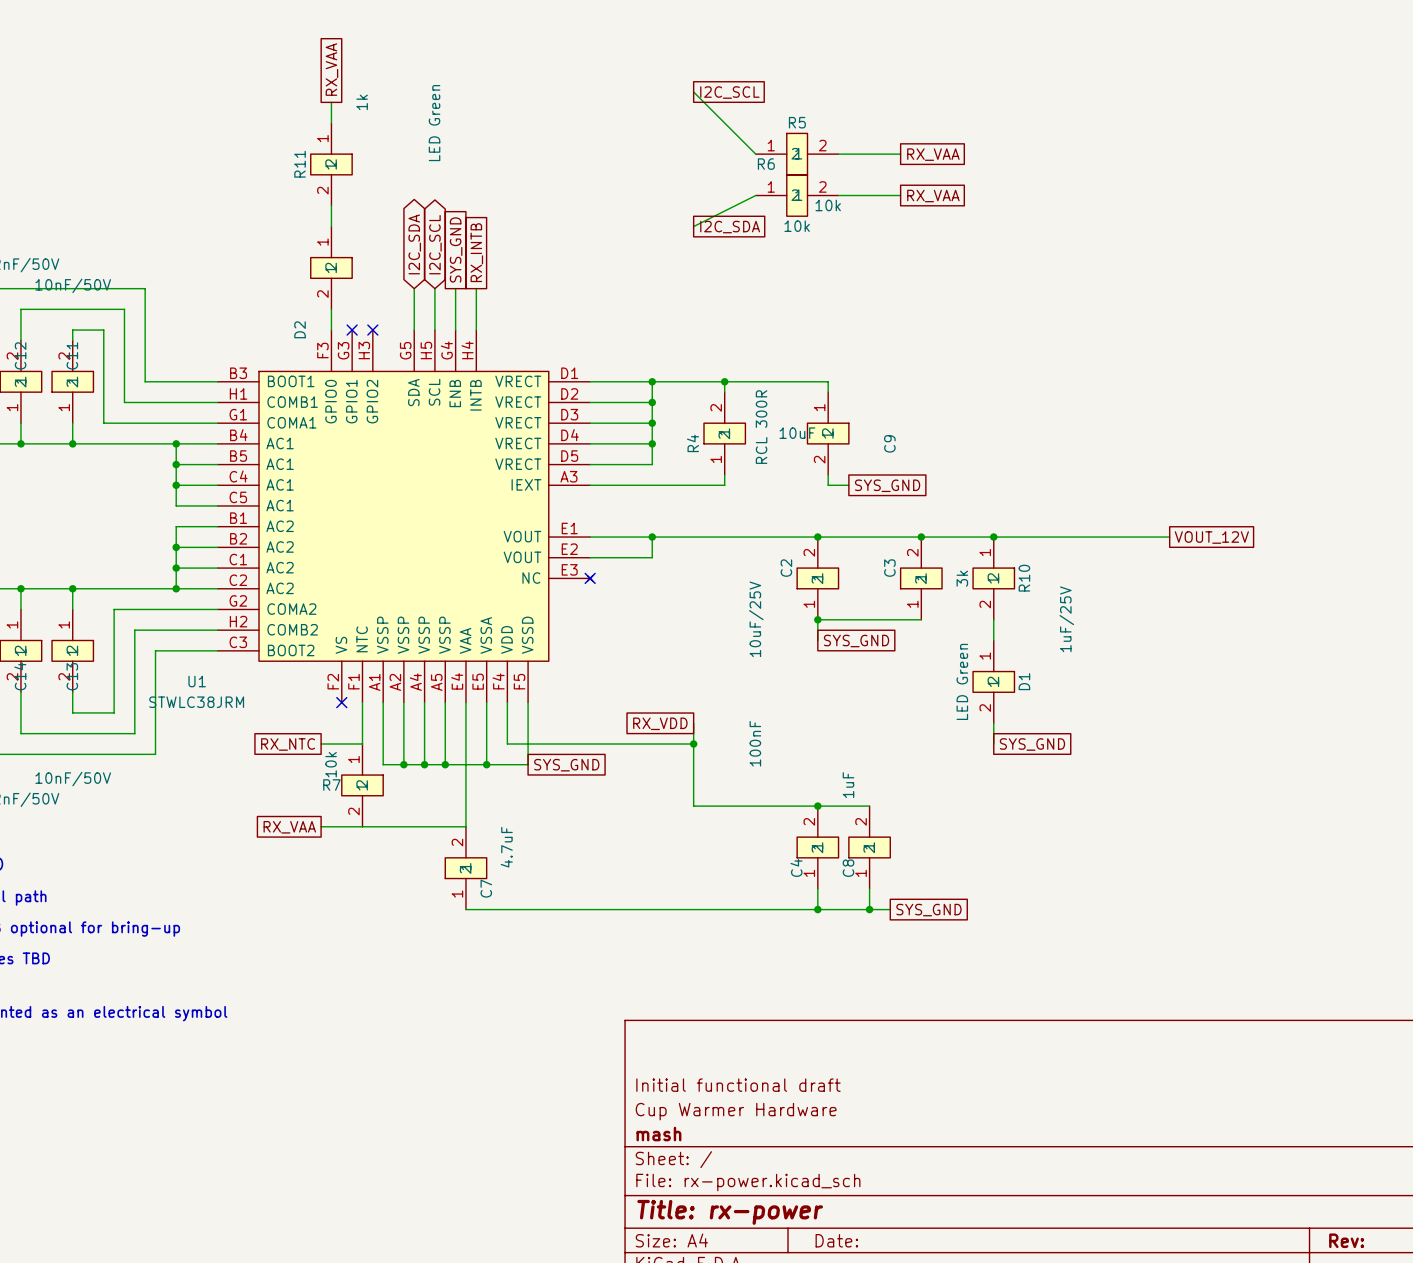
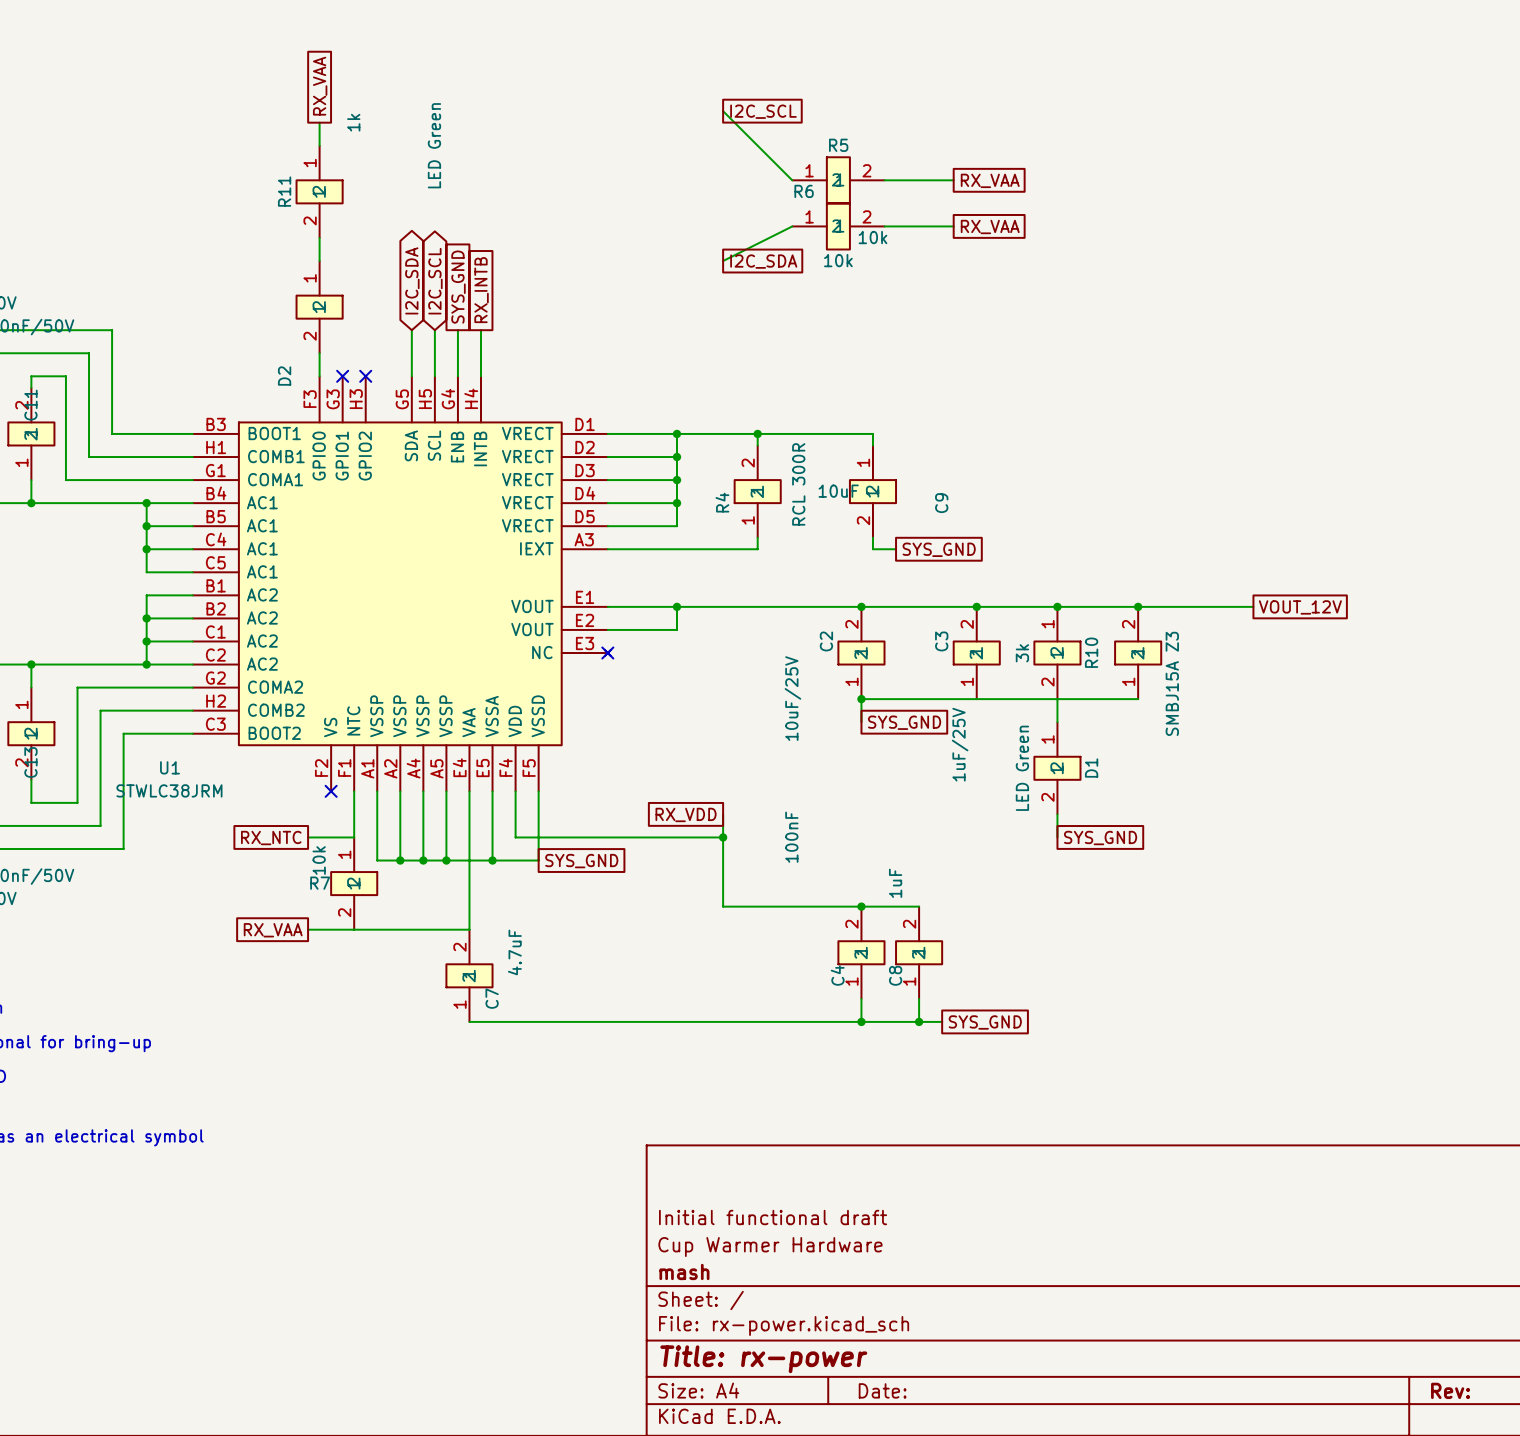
junction: none -> (1138, 606)
Z3: none -> SMBJ15A (1138, 653)
wire: none -> (976, 699) (1138, 699)
C3 value position: 1uF/25V (1066, 619) -> 1uF/25V (960, 744)

